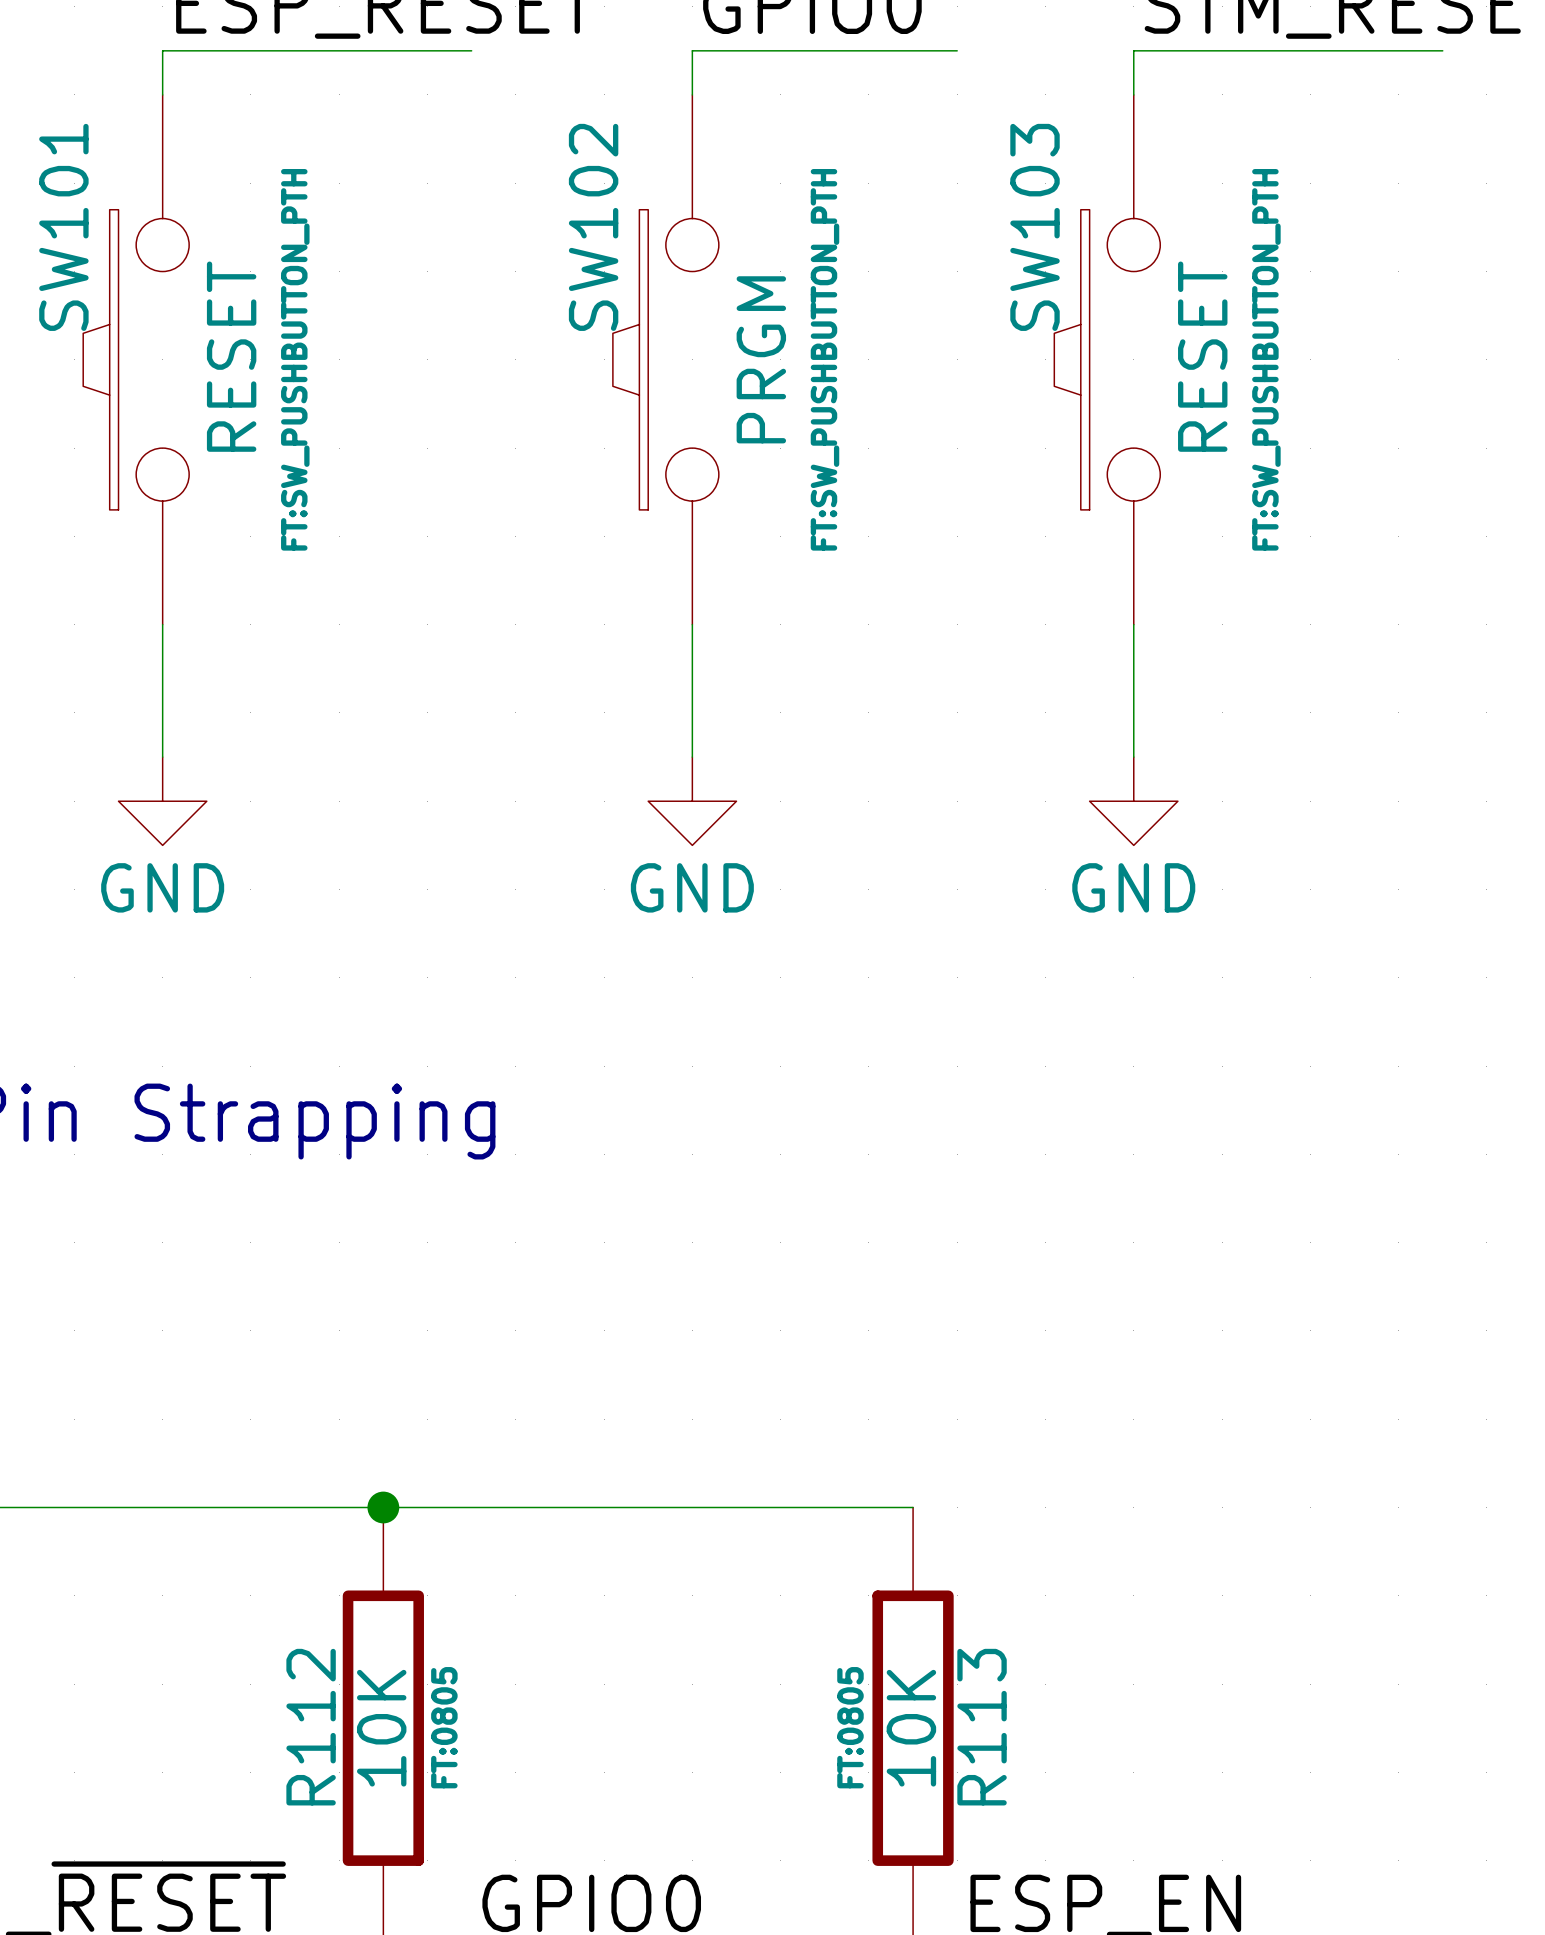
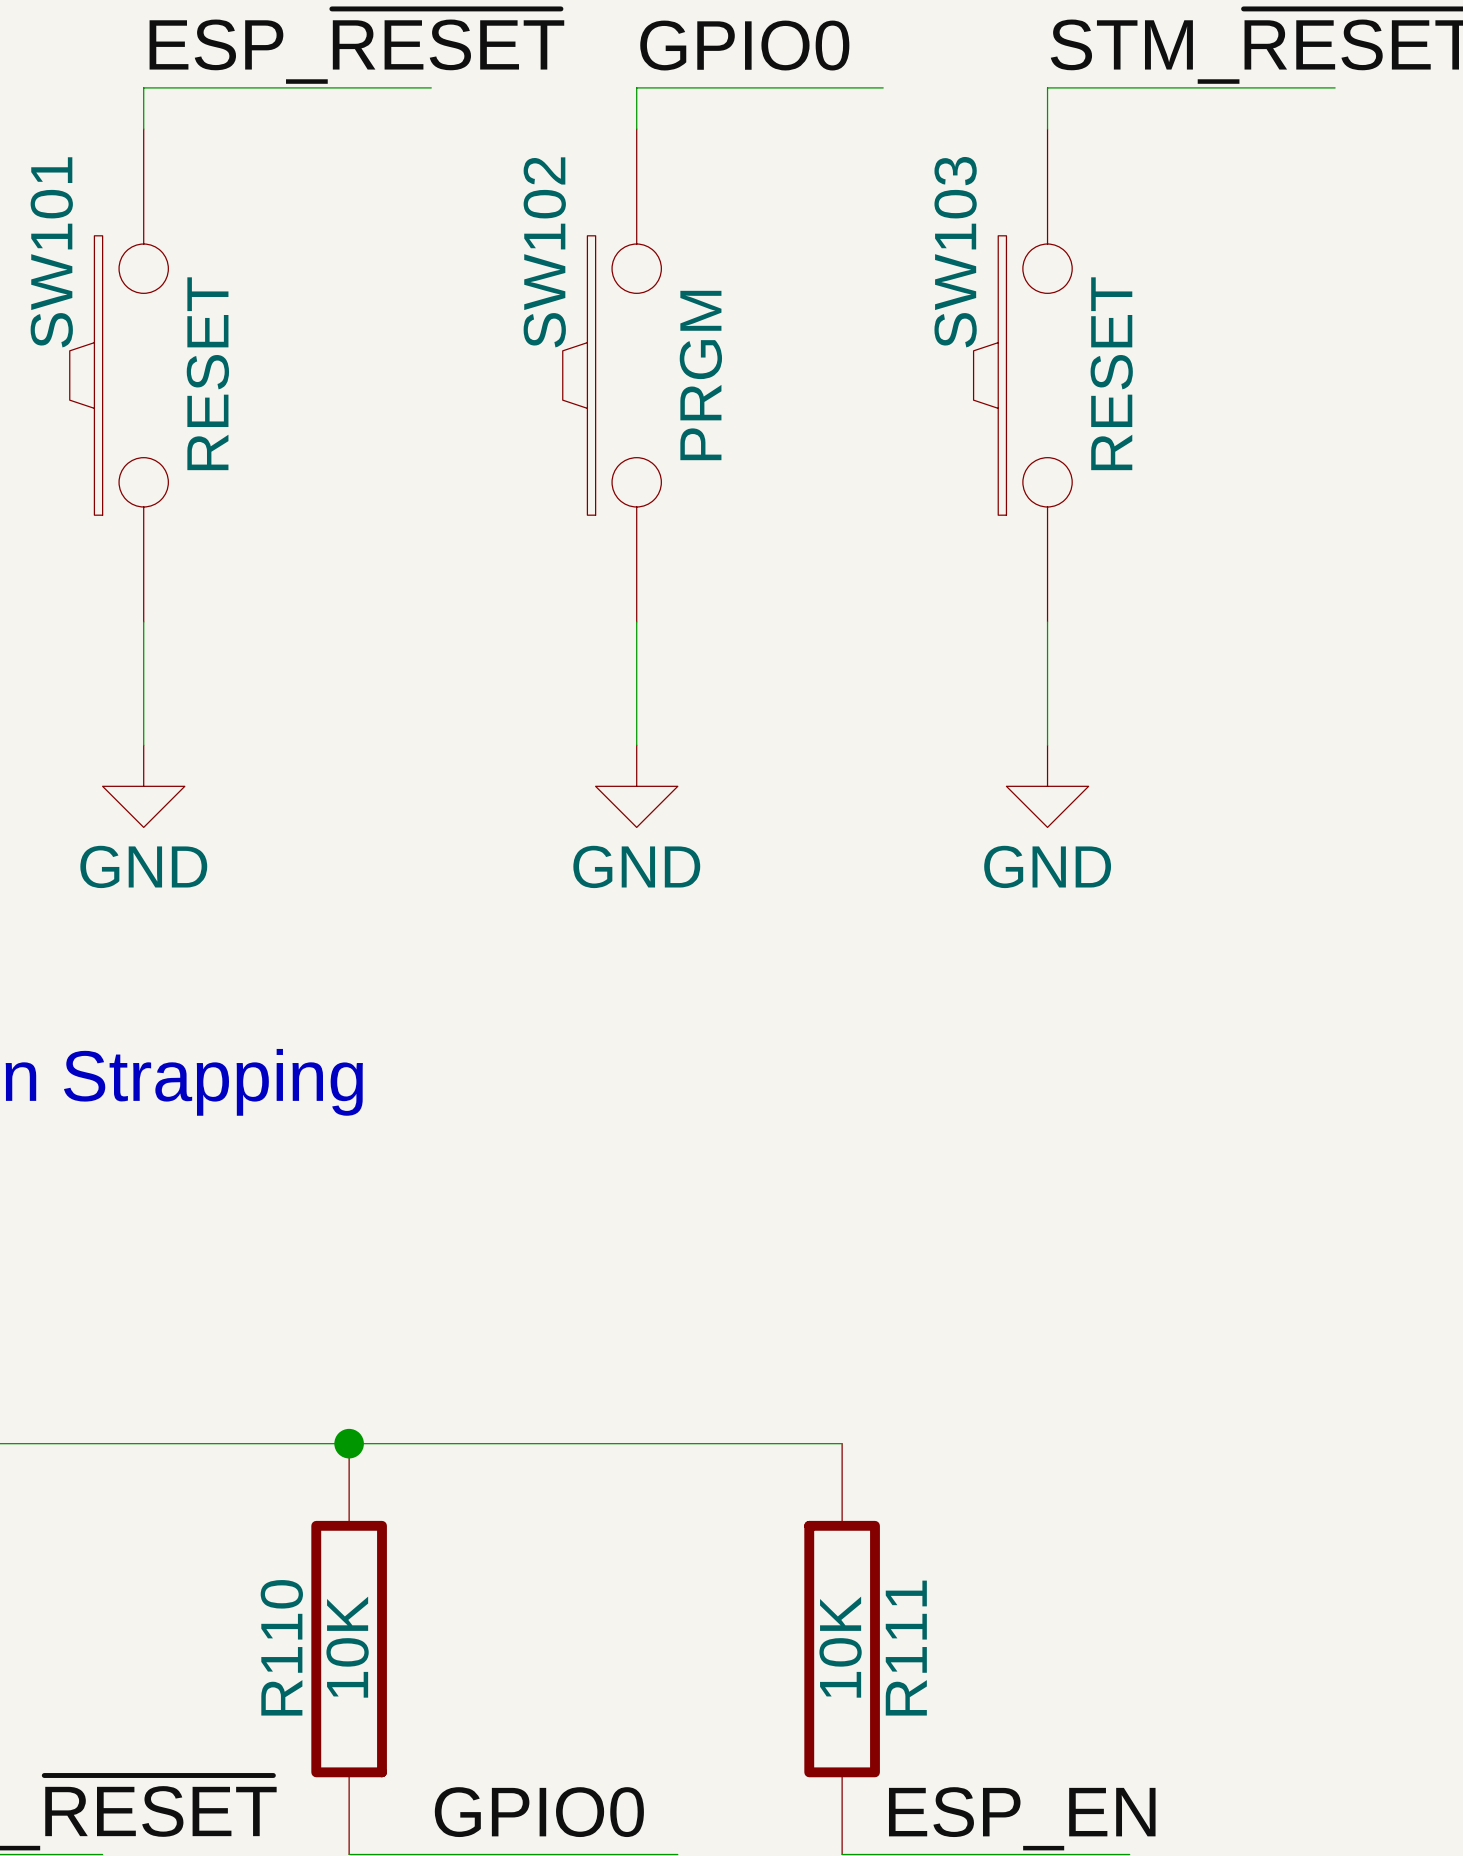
SW101 text: FT:SW_PUSHBUTTON_PTH (295, 359) -> none
SW102 text: FT:SW_PUSHBUTTON_PTH (824, 359) -> none
SW103 text: FT:SW_PUSHBUTTON_PTH (1266, 359) -> none
R112 name: R112 (311, 1727) -> R110 (281, 1647)
R112 text: FT:0805 (444, 1727) -> none
R113 text: FT:0805 (850, 1727) -> none
R113 name: R113 (982, 1727) -> R111 (906, 1648)

